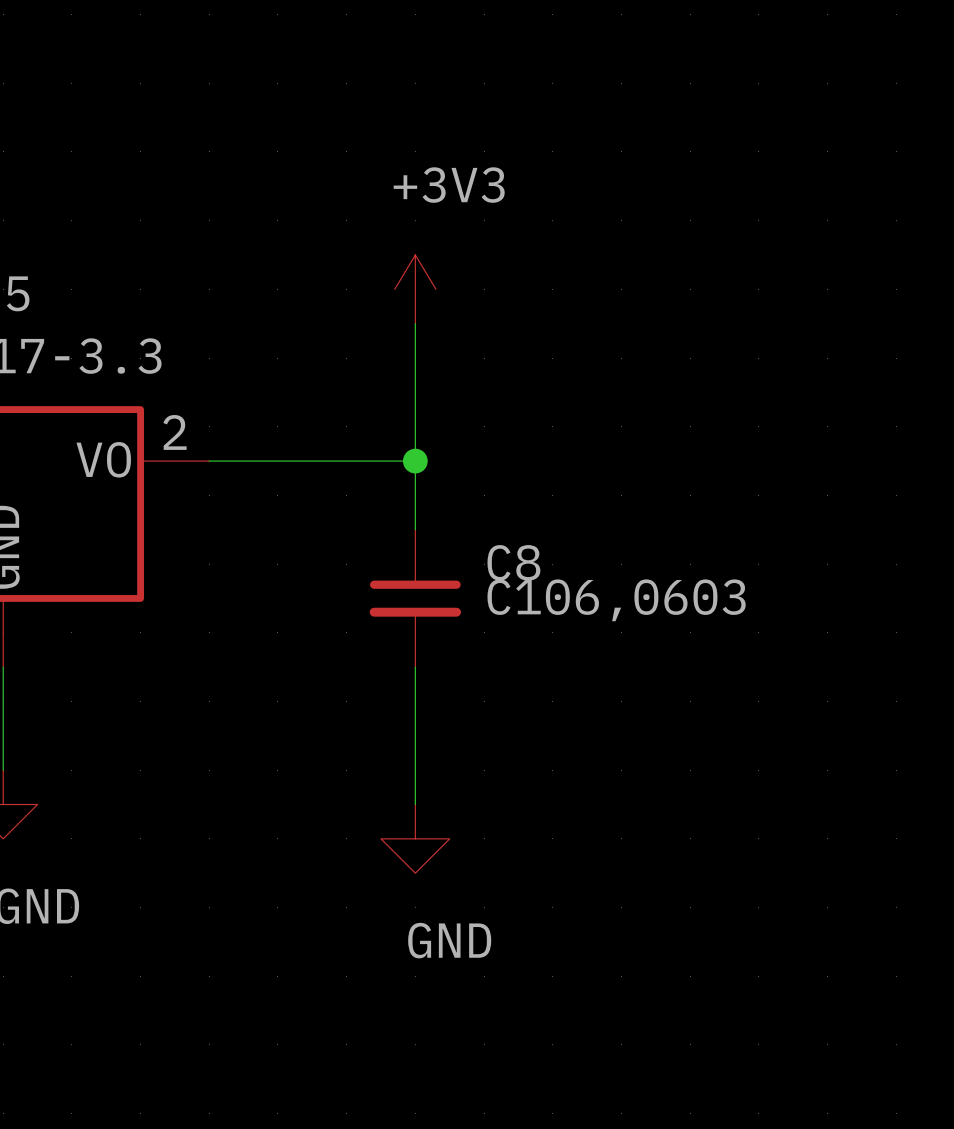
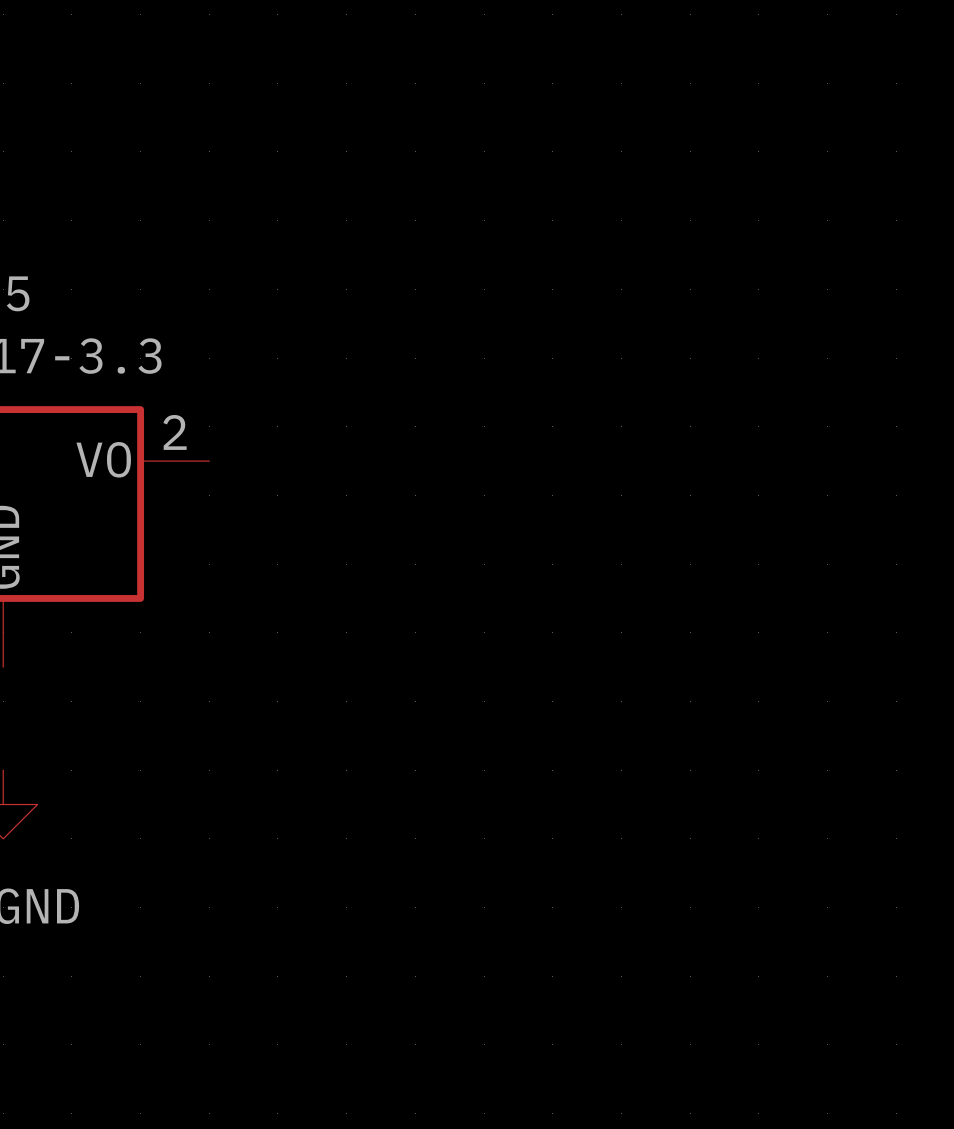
power symbol: +3V3 (415, 289) -> none
wire: (415, 323) (415, 529) -> none
wire: (209, 461) (415, 461) -> none
junction: (415, 461) -> none
C8: C106,0603 (415, 598) -> none
wire: (3, 667) (3, 770) -> none
wire: (415, 667) (415, 804) -> none
power symbol: GND (415, 838) -> none

